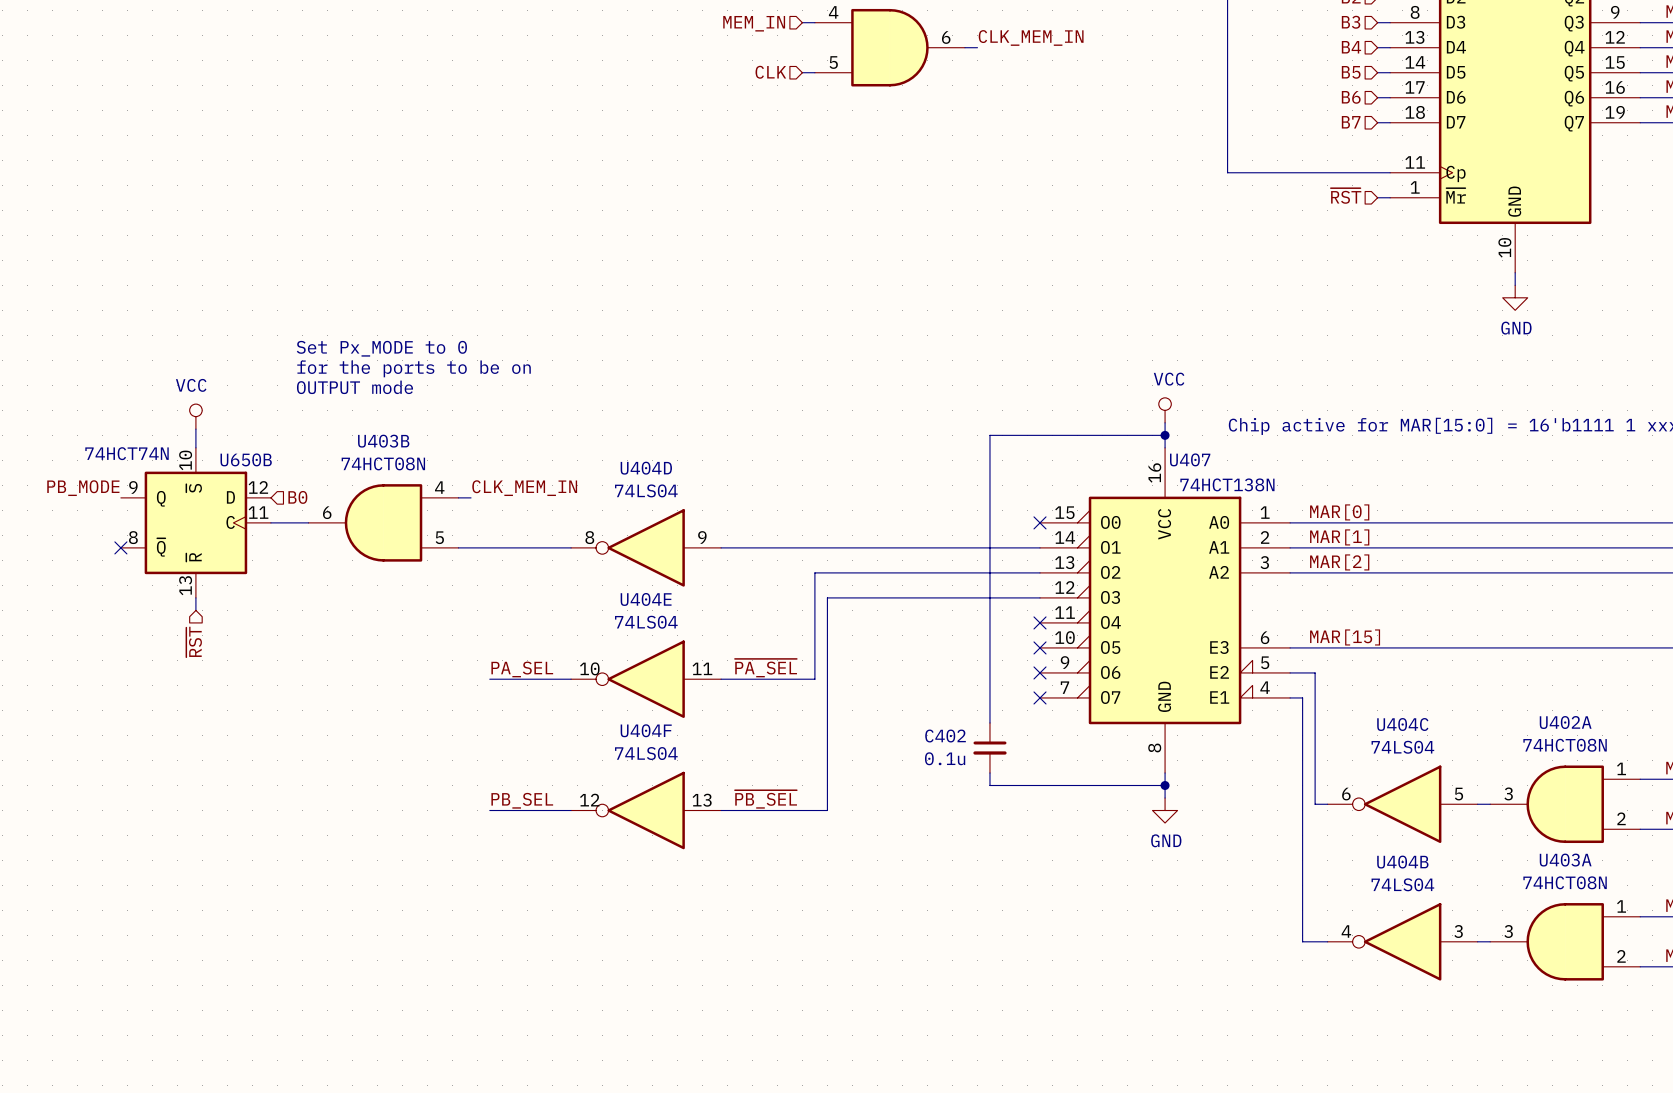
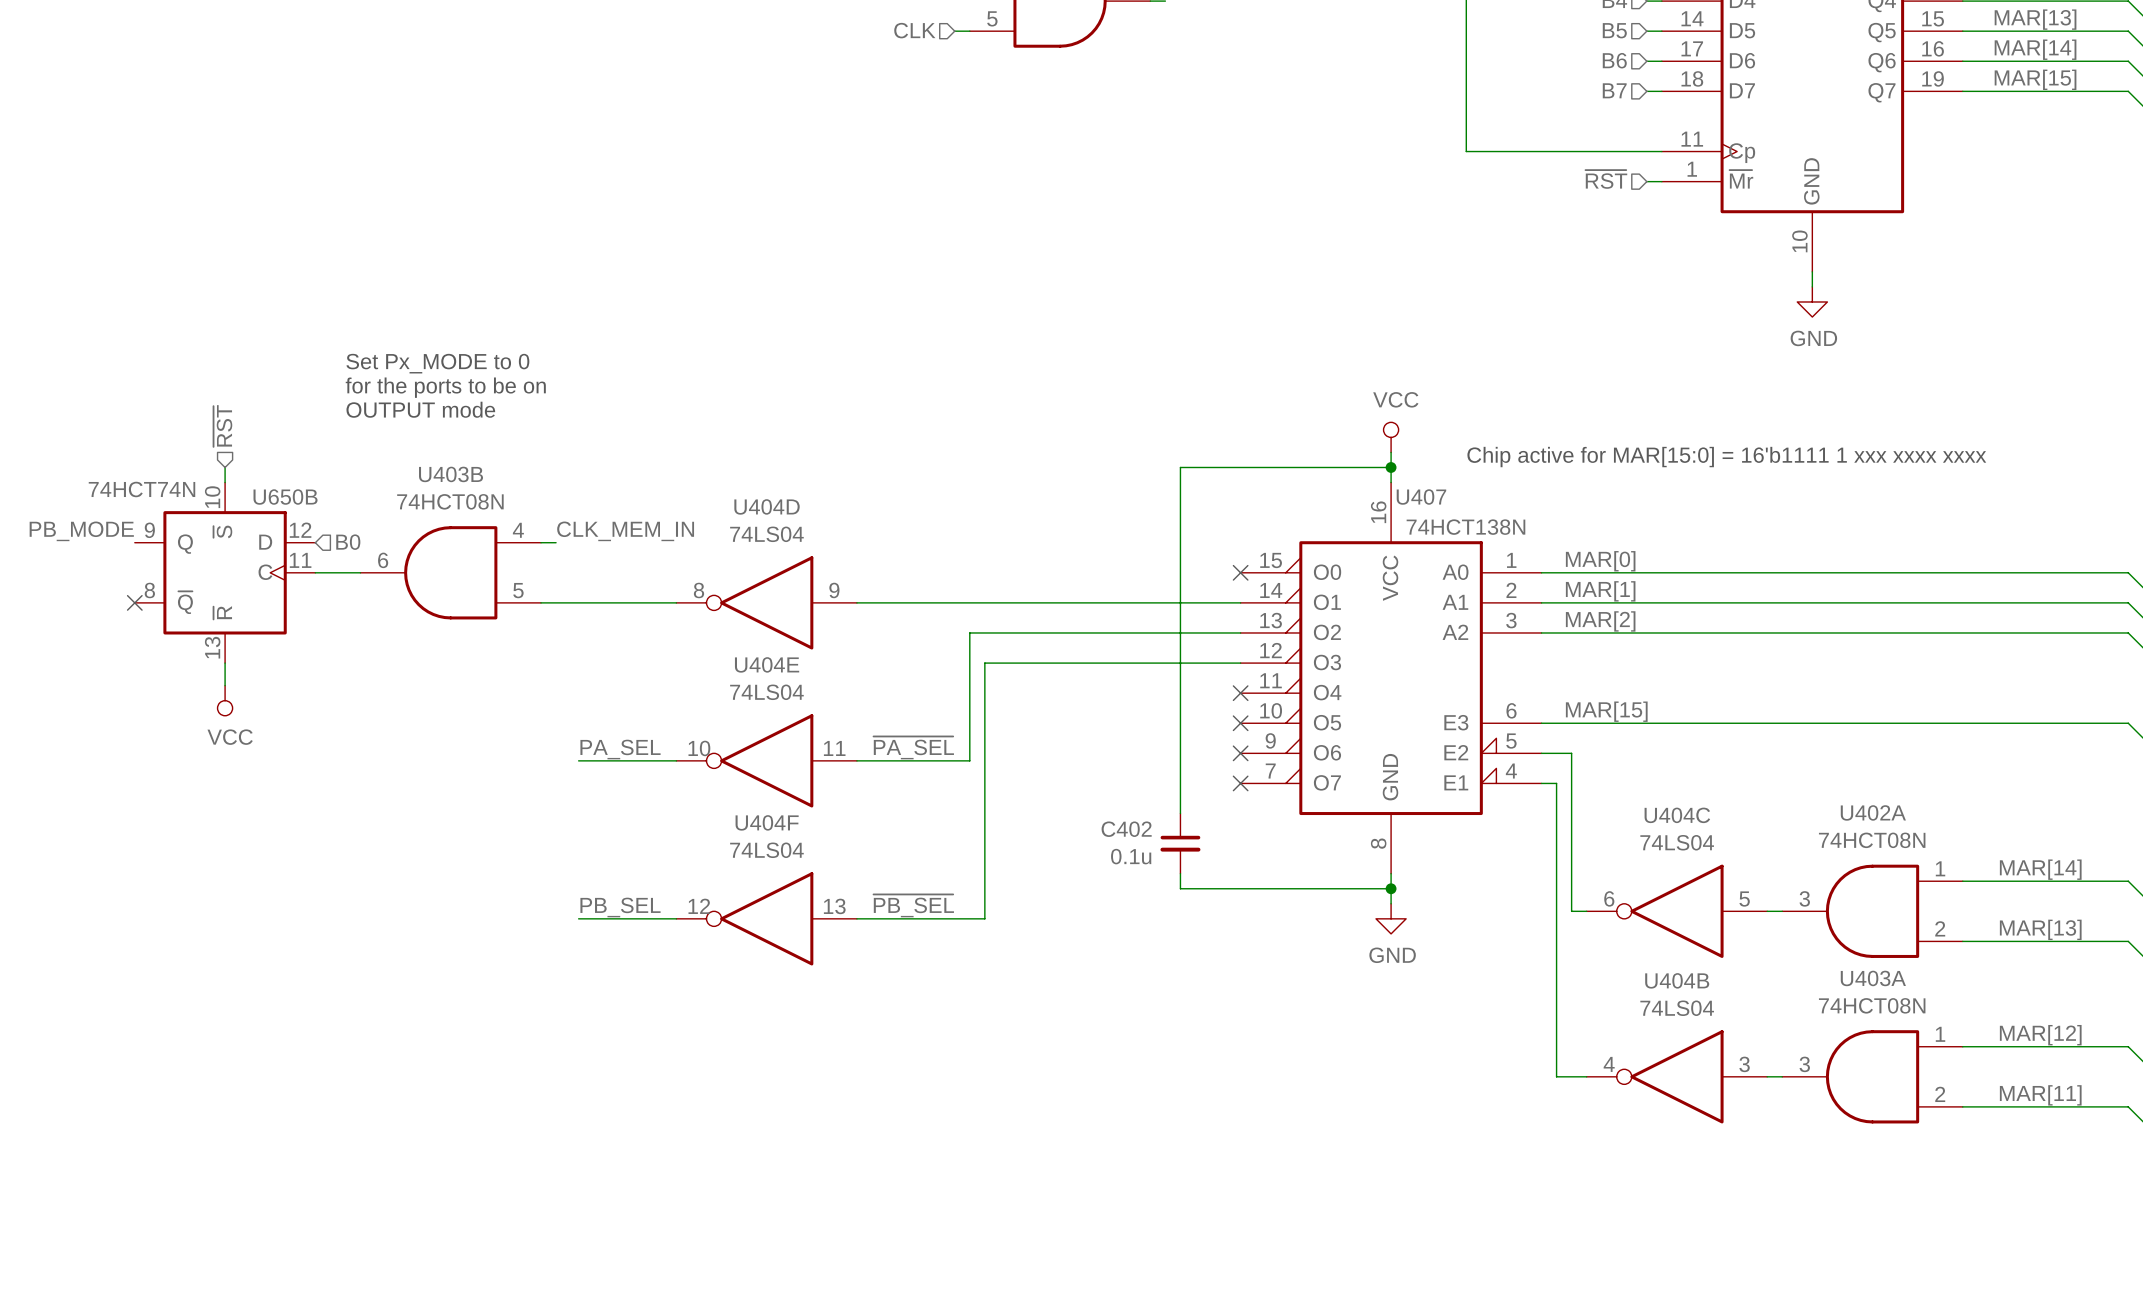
power symbol rotation: 0° (195, 416) -> 180° (225, 700)
power symbol position: VCC (195, 416) -> VCC (225, 700)
wire: (195, 429) (195, 435) -> (225, 678) (225, 685)
hierarchical label rotation: 0° (194, 642) -> 180° (222, 426)
hierarchical label position: ~{RST} (194, 642) -> ~{RST} (222, 426)

